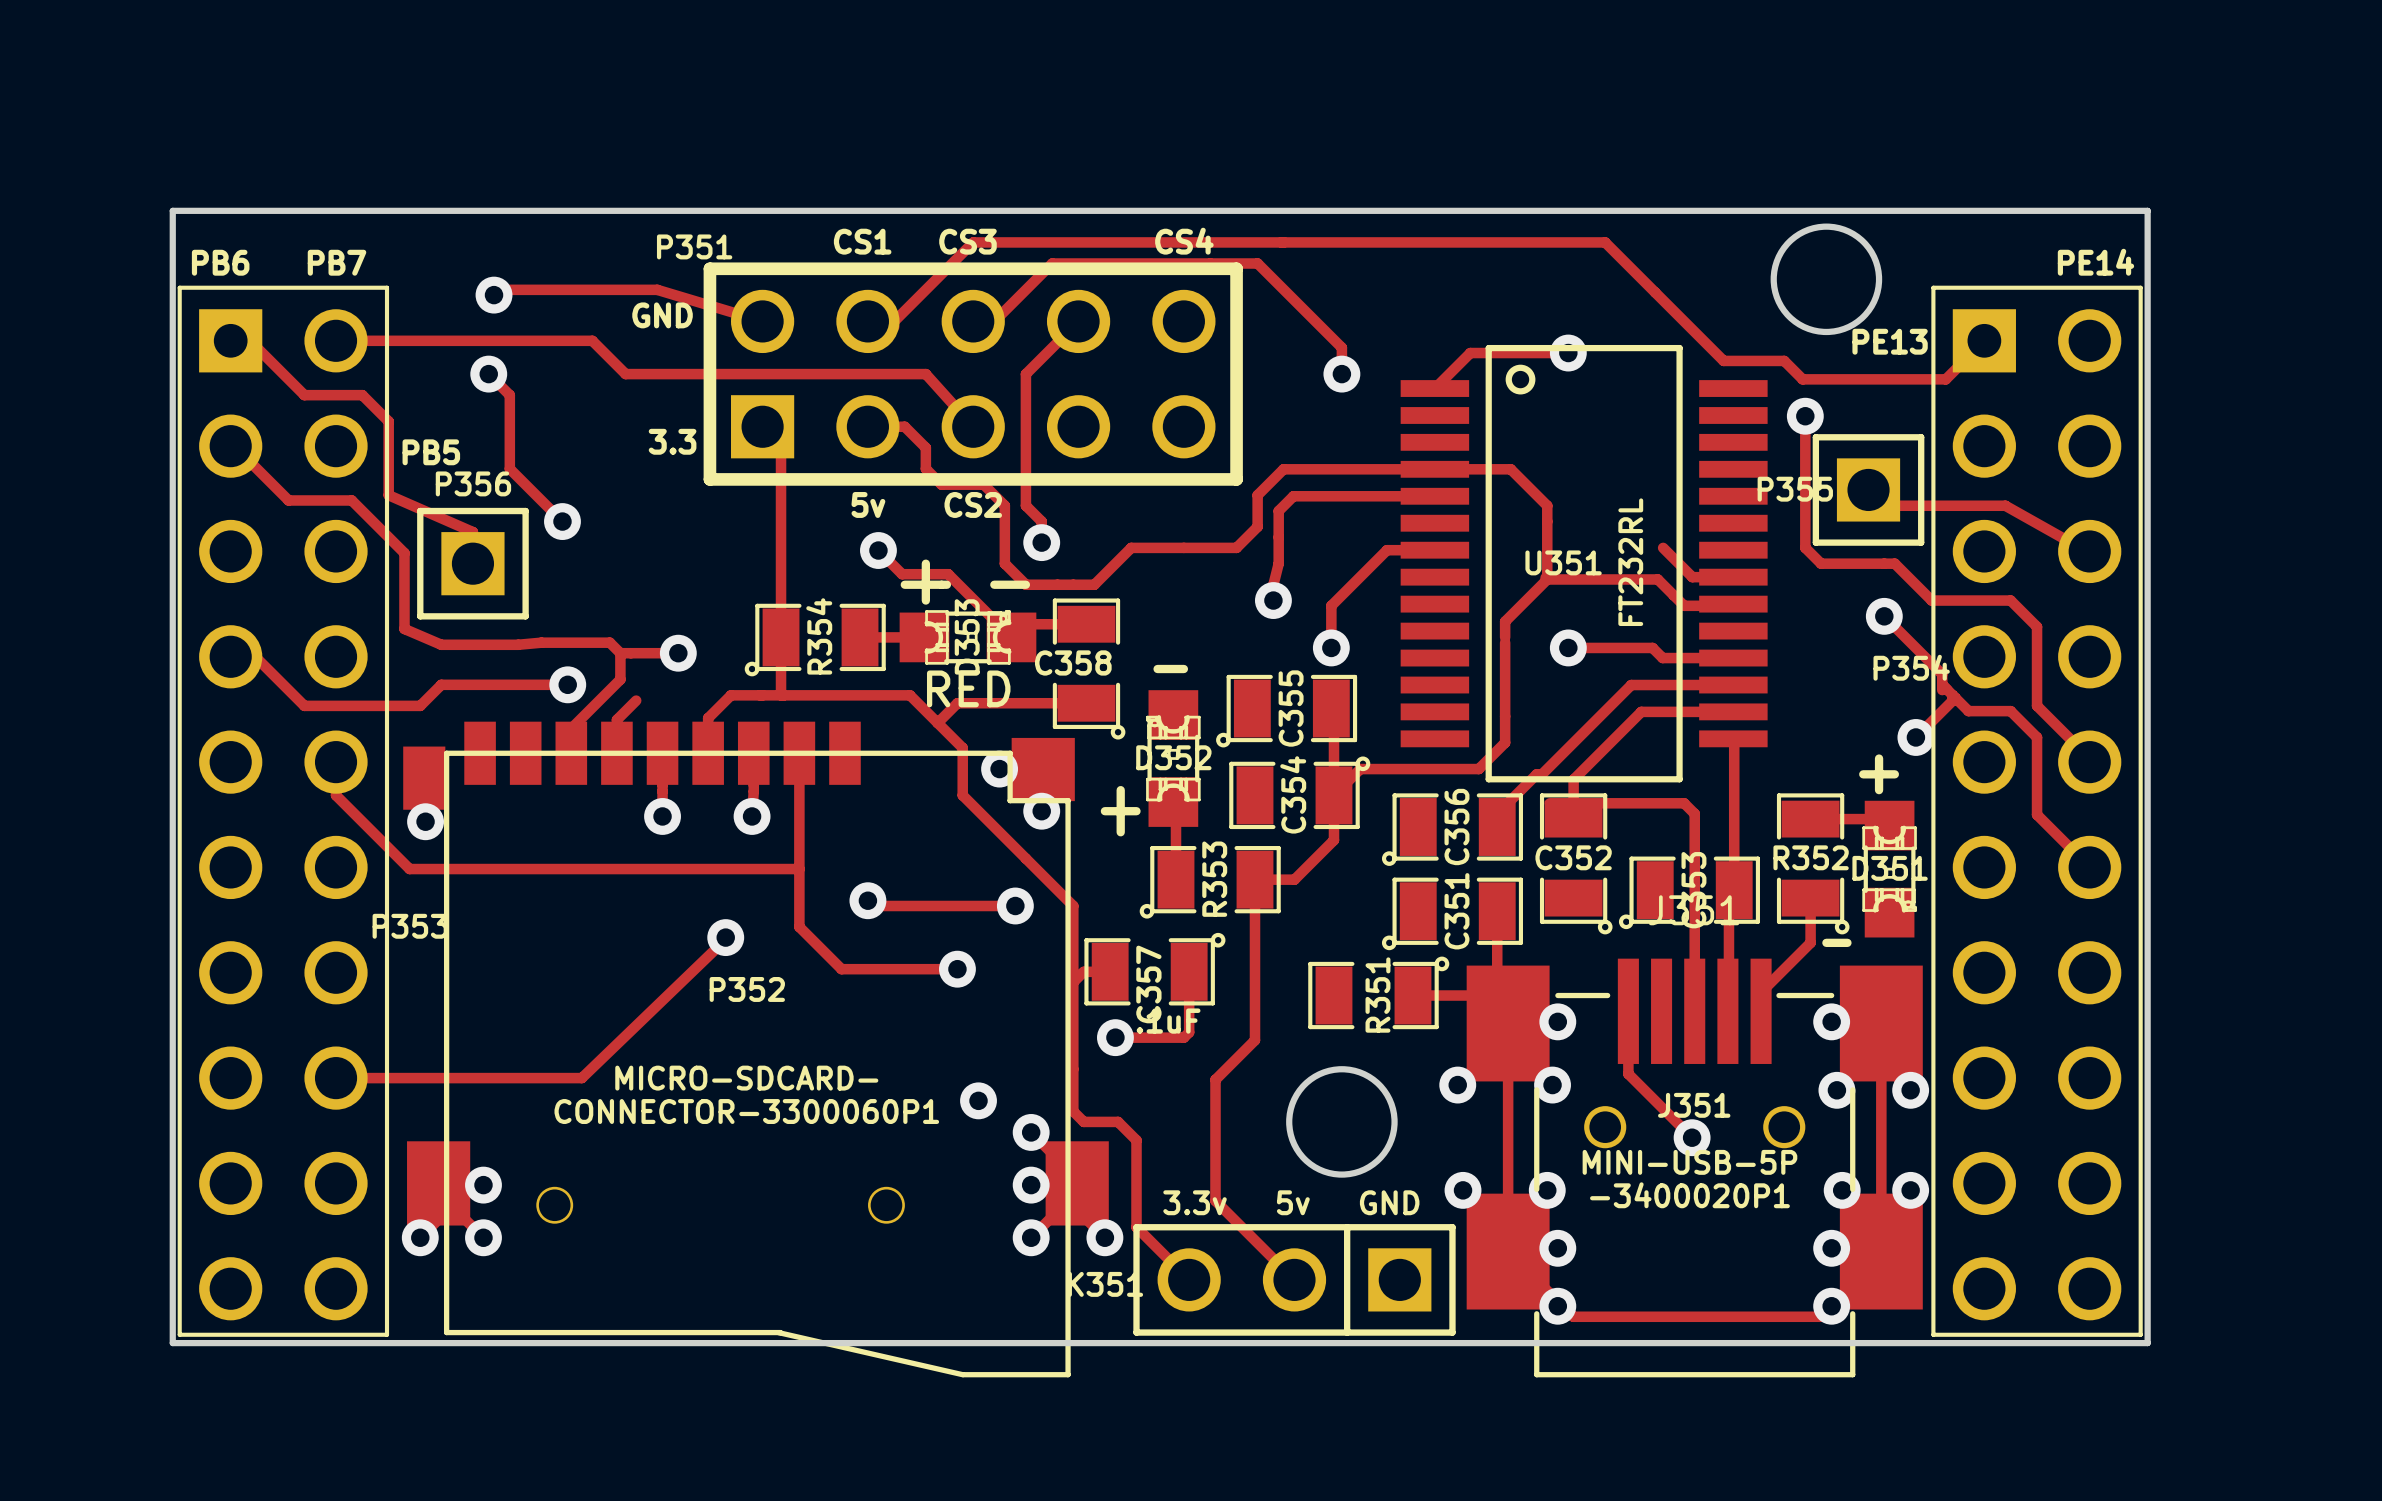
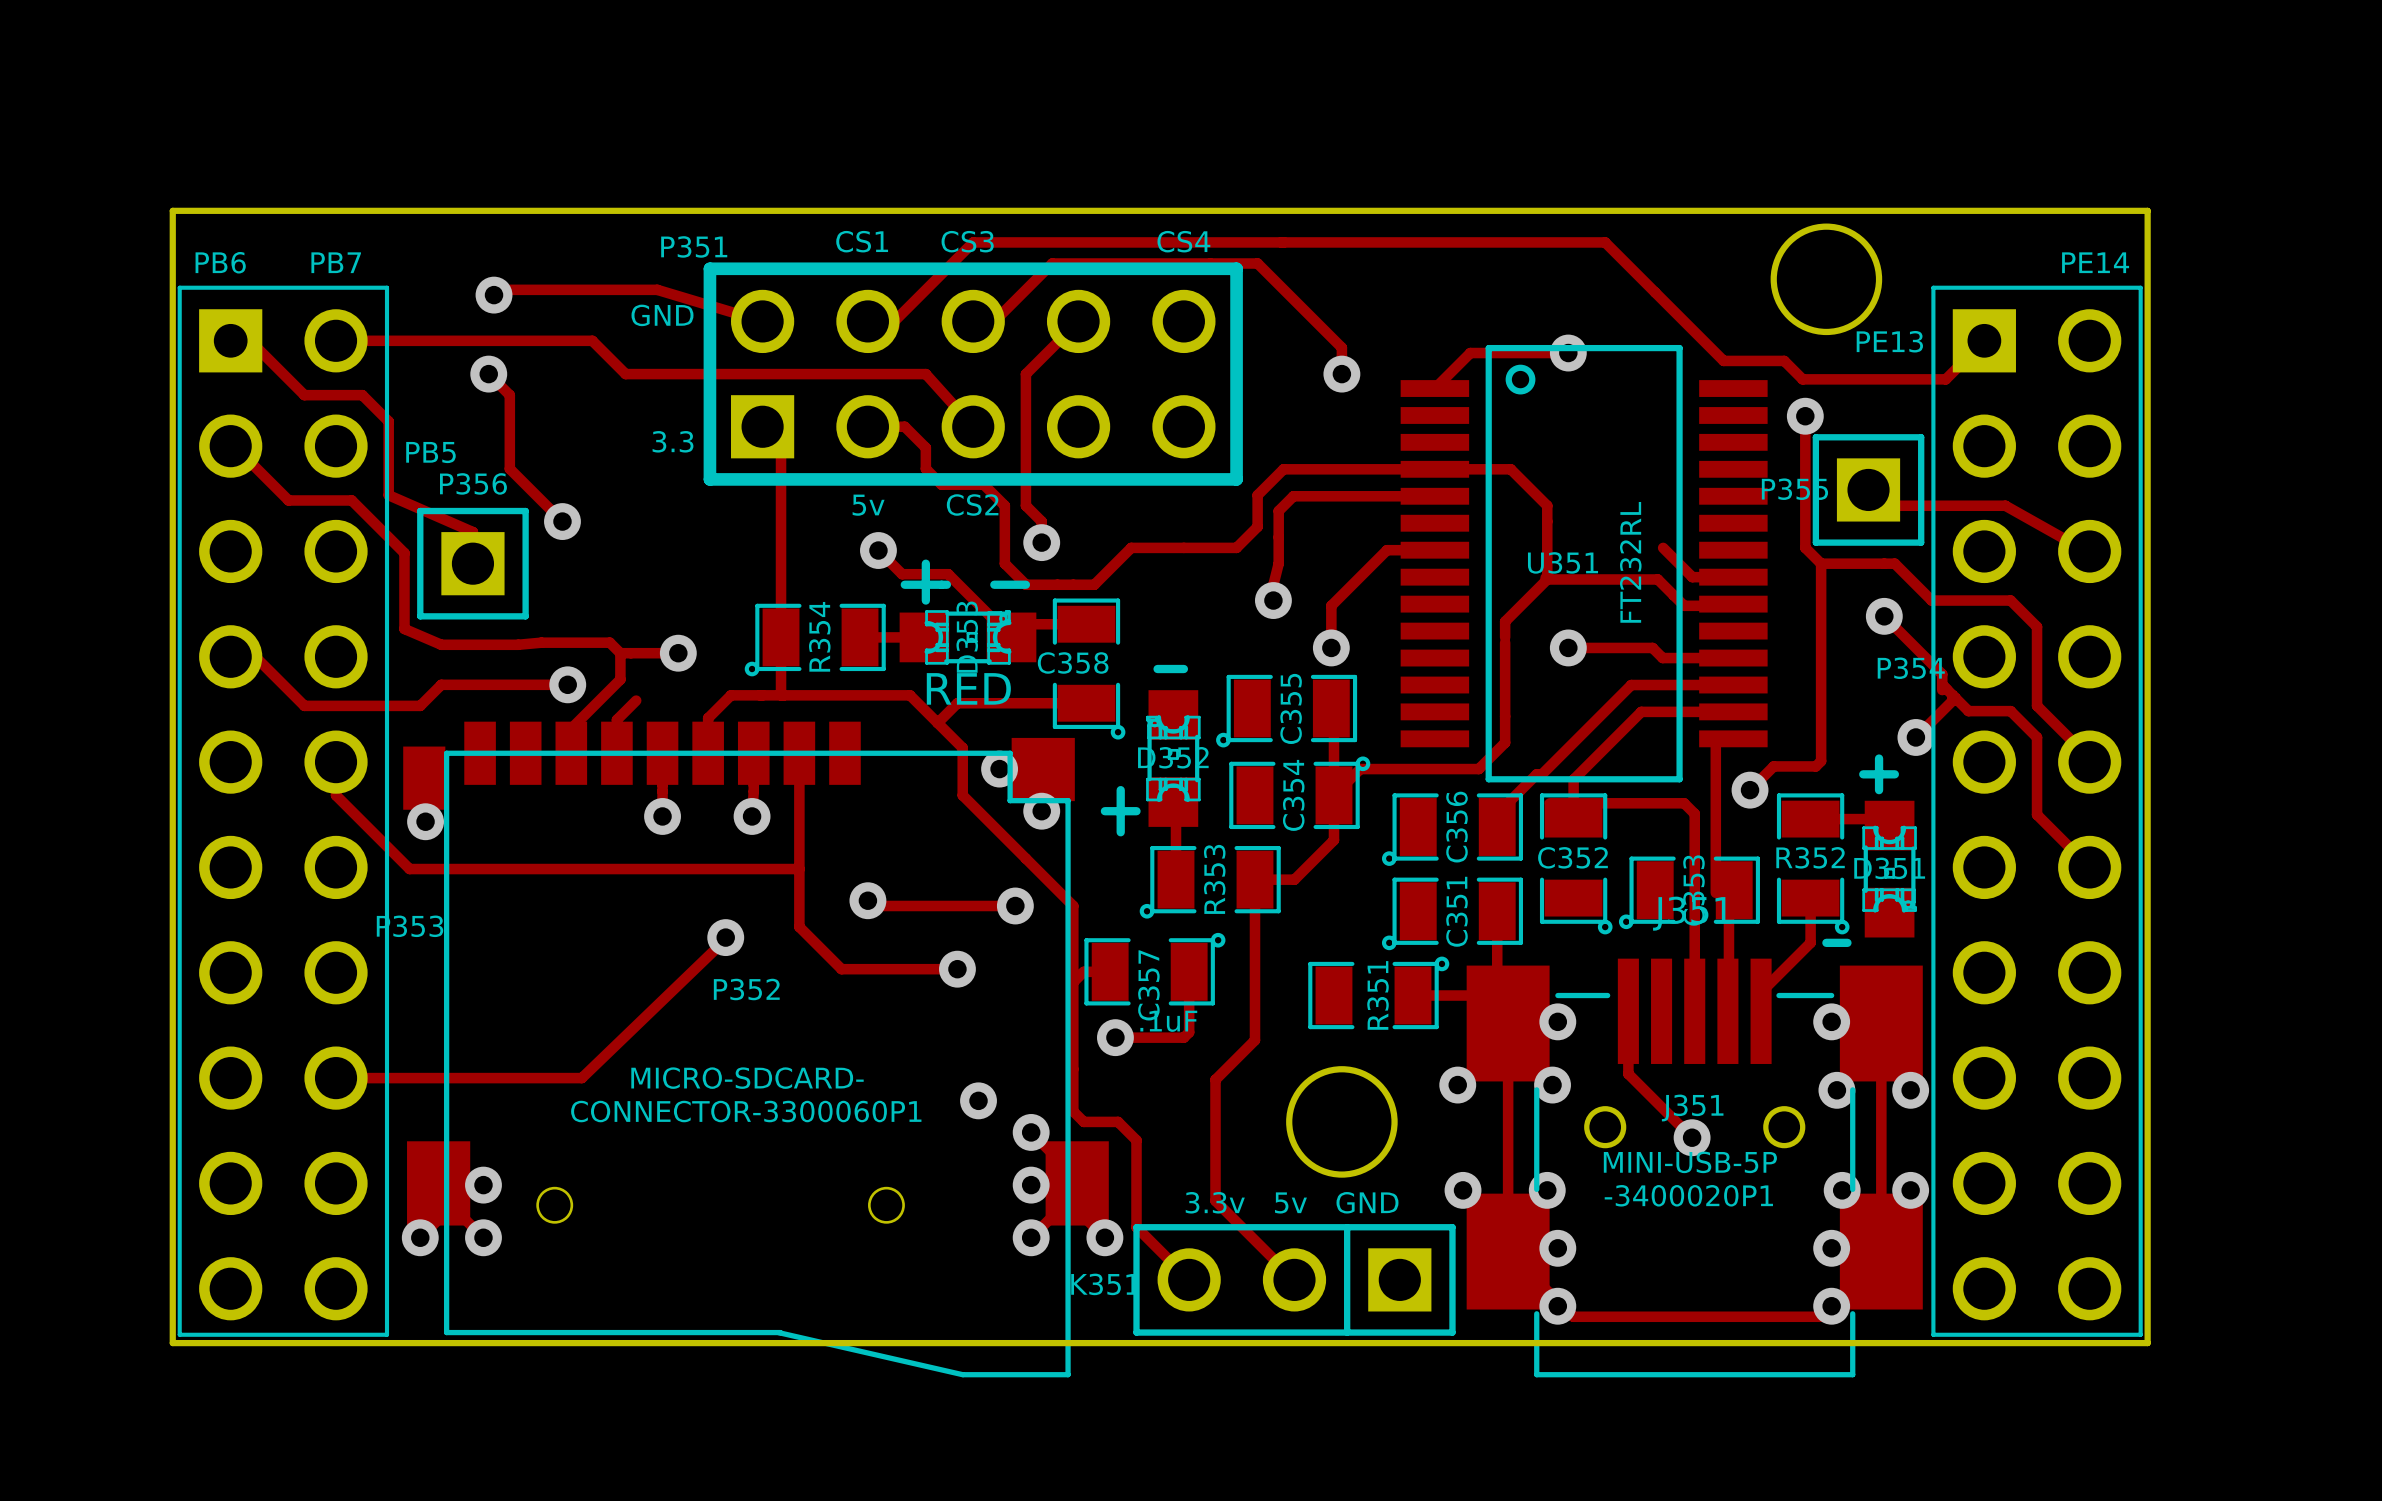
track: none -> (1821, 563) (1821, 761) (1815, 766) (1773, 766) (1750, 790)
track: (1733, 738) (1734, 890) -> none
track: none -> (1715, 742) (1715, 892)
via: none -> (1750, 790)

